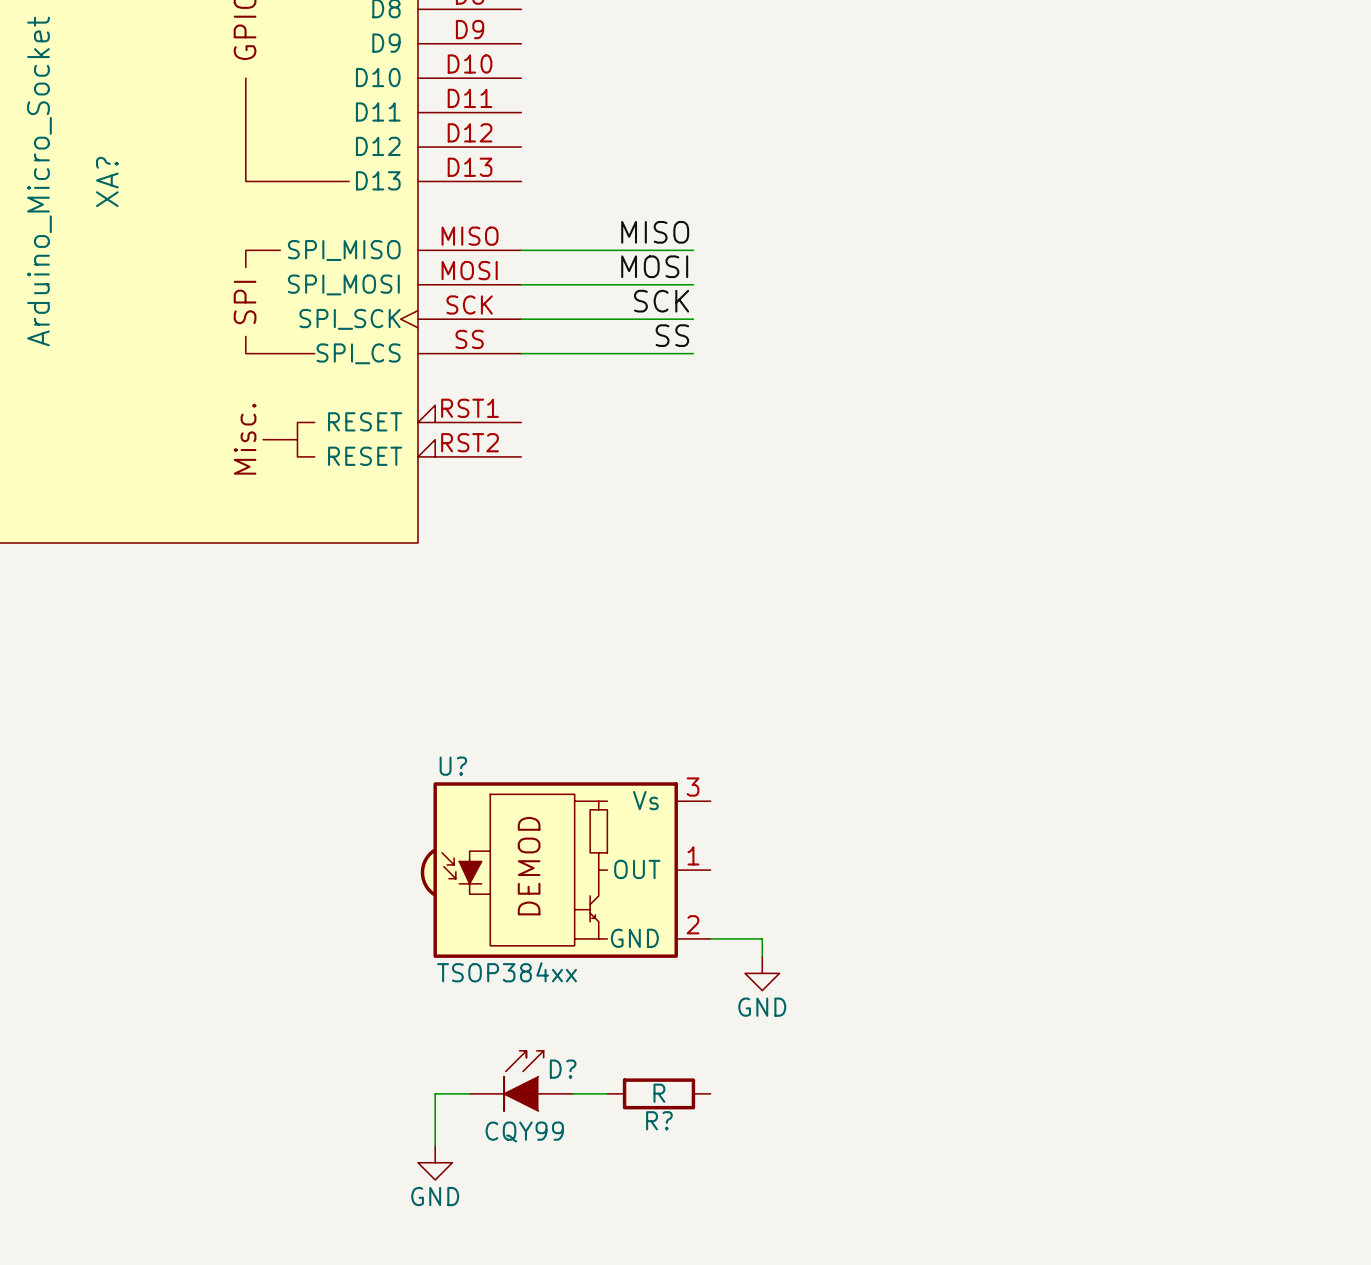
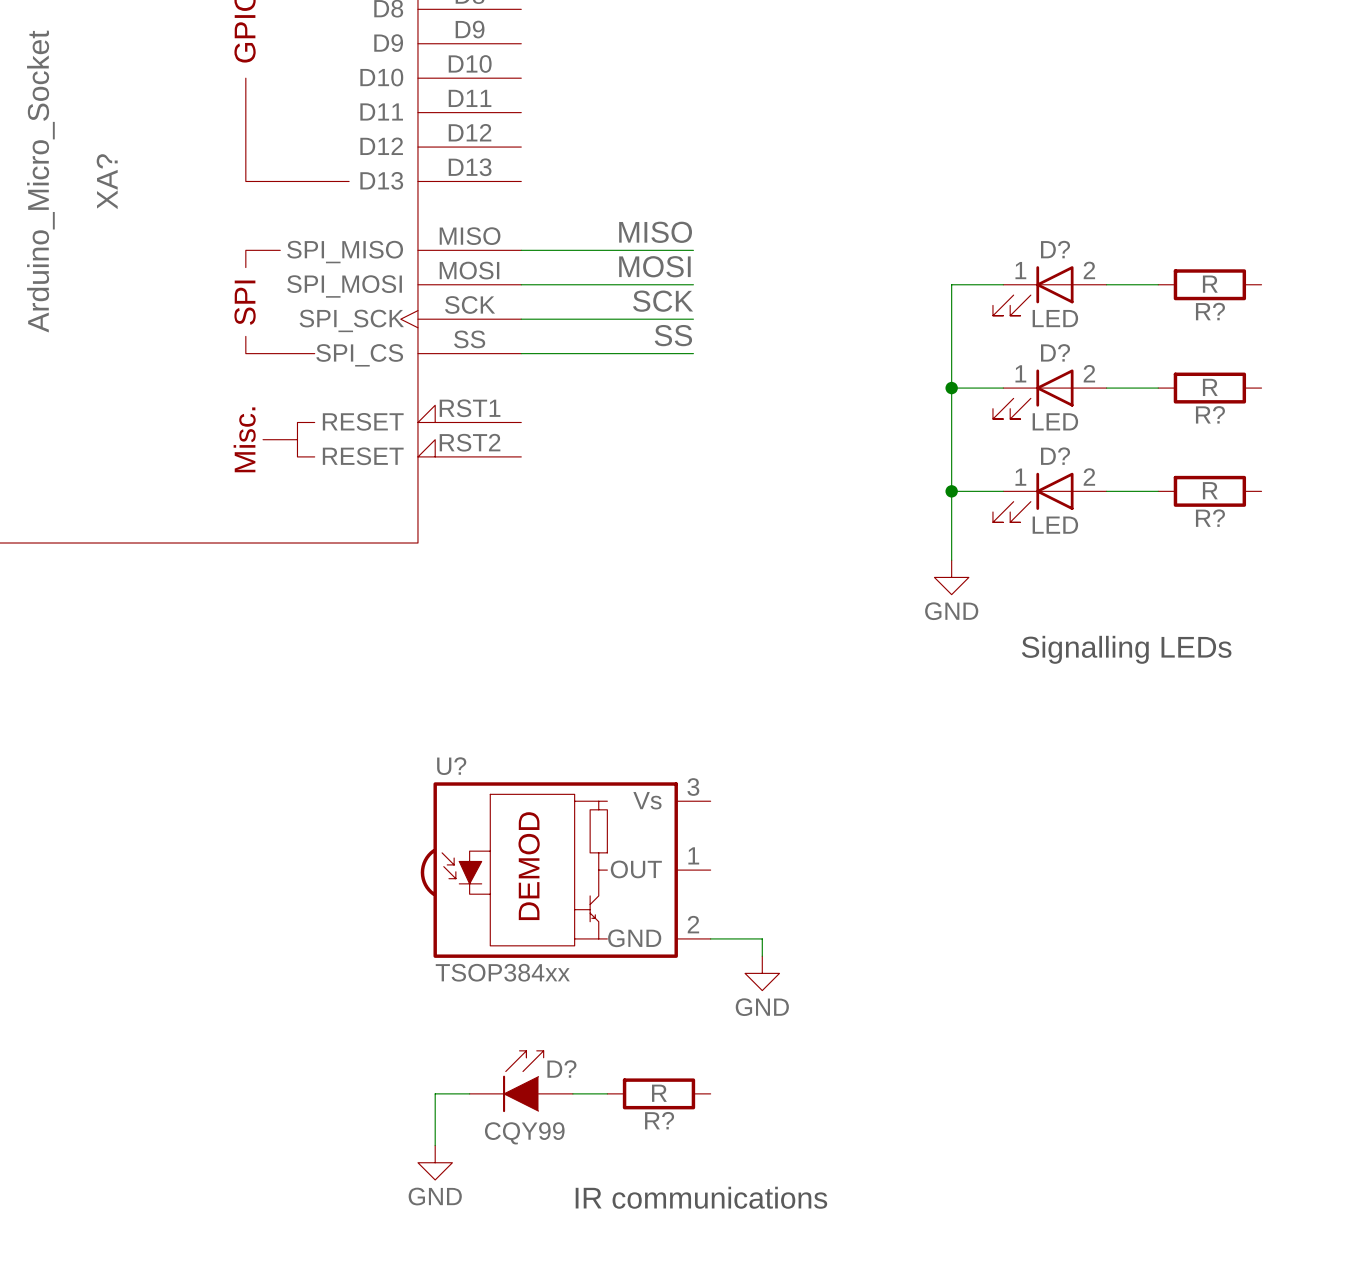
wire: none -> (1003, 284) (951, 284) (951, 560)
wire: none -> (1106, 284) (1158, 284)
R?: none -> R (1209, 284)
D?: none -> LED (1049, 290)
wire: none -> (951, 388) (1003, 388)
junction: none -> (951, 388)
wire: none -> (1106, 388) (1158, 388)
R?: none -> R (1209, 388)
D?: none -> LED (1049, 394)
wire: none -> (951, 491) (1003, 491)
junction: none -> (951, 491)
wire: none -> (1106, 491) (1158, 491)
R?: none -> R (1209, 491)
D?: none -> LED (1049, 497)
power symbol: none -> GND (951, 577)
text: none -> Signalling LEDs (1126, 649)
text: none -> IR communications (701, 1197)

